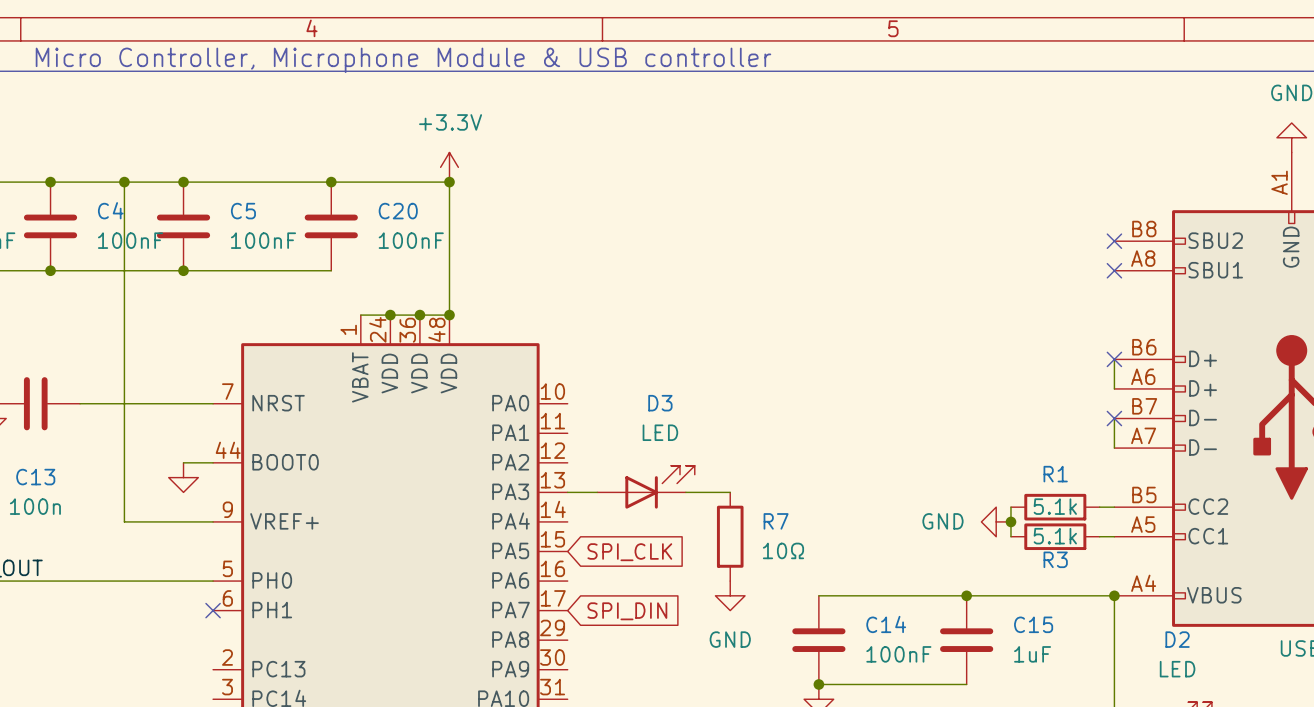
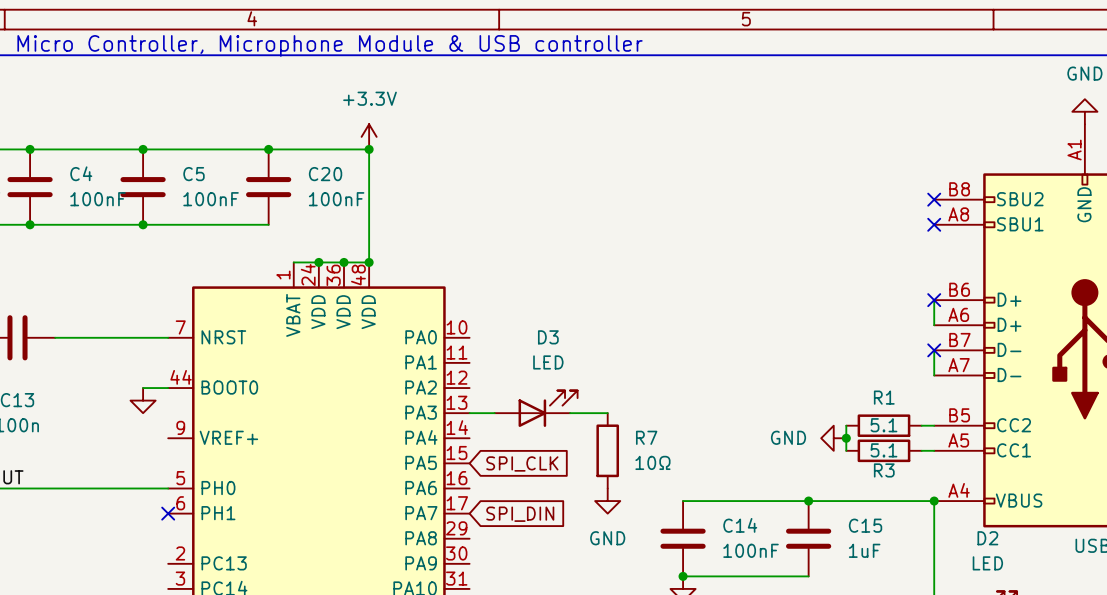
wire: (124, 182) (124, 521) (213, 521) -> none
junction: (124, 182) -> none
R1 value: 5.1k (1055, 506) -> 5.1 (883, 425)
R3 value: 5.1k (1055, 536) -> 5.1 (883, 450)

